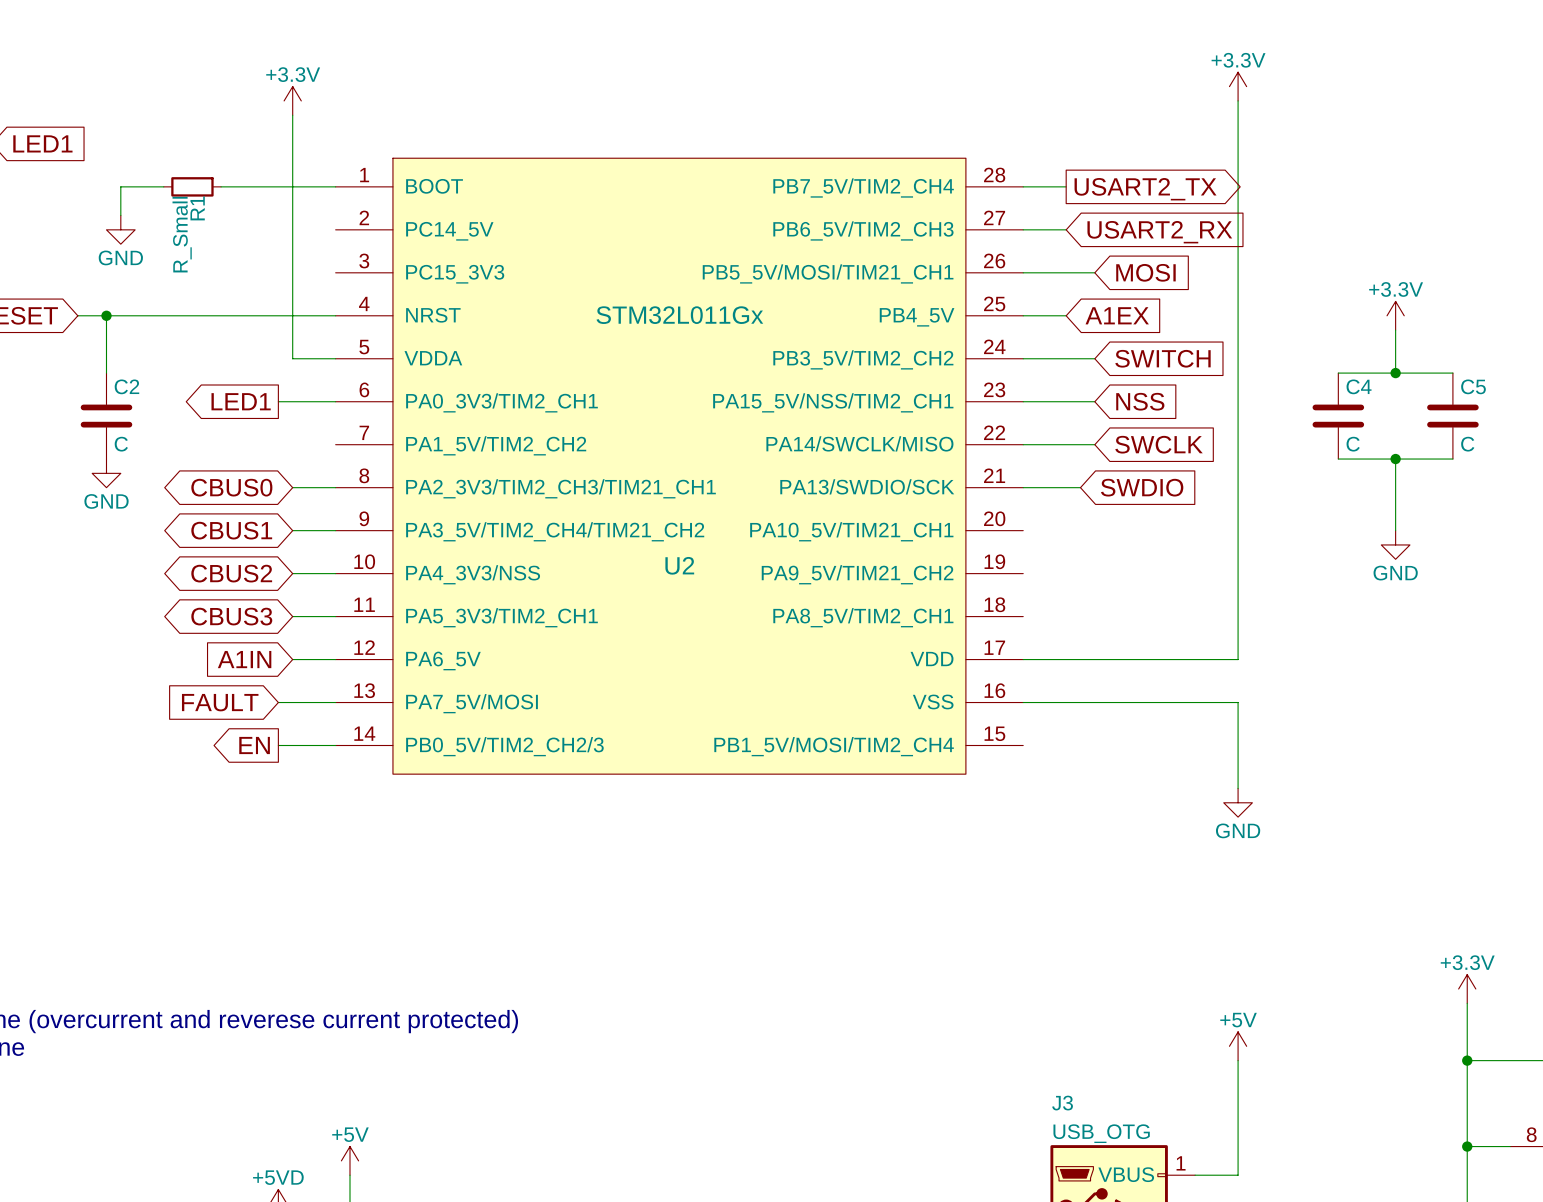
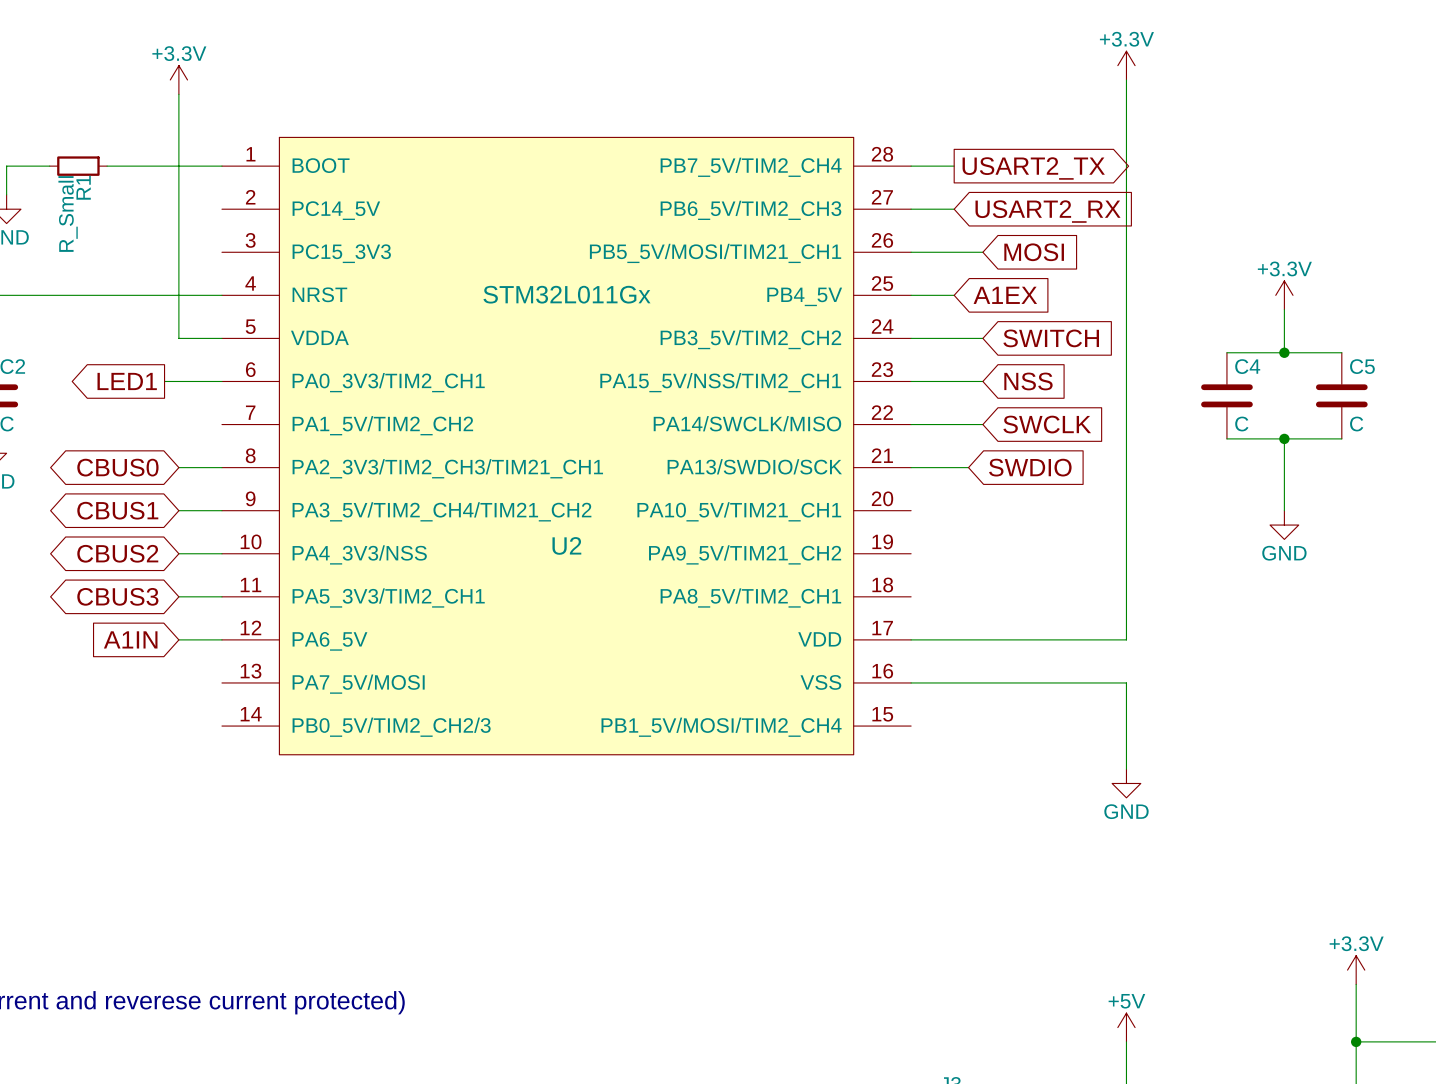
global label: FAULT (220, 702) -> none
wire: (278, 702) (335, 702) -> none
global label: EN (254, 745) -> none
wire: (278, 745) (335, 745) -> none

